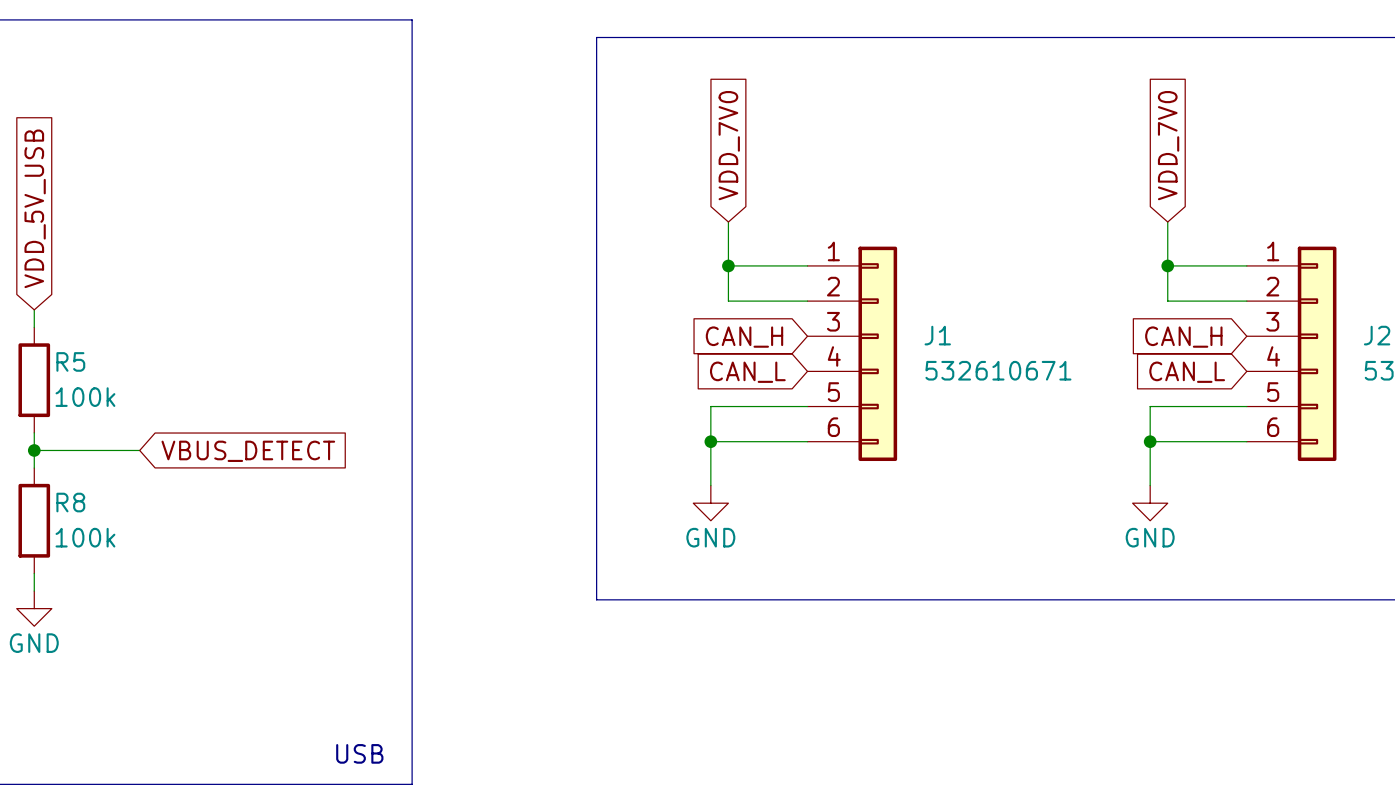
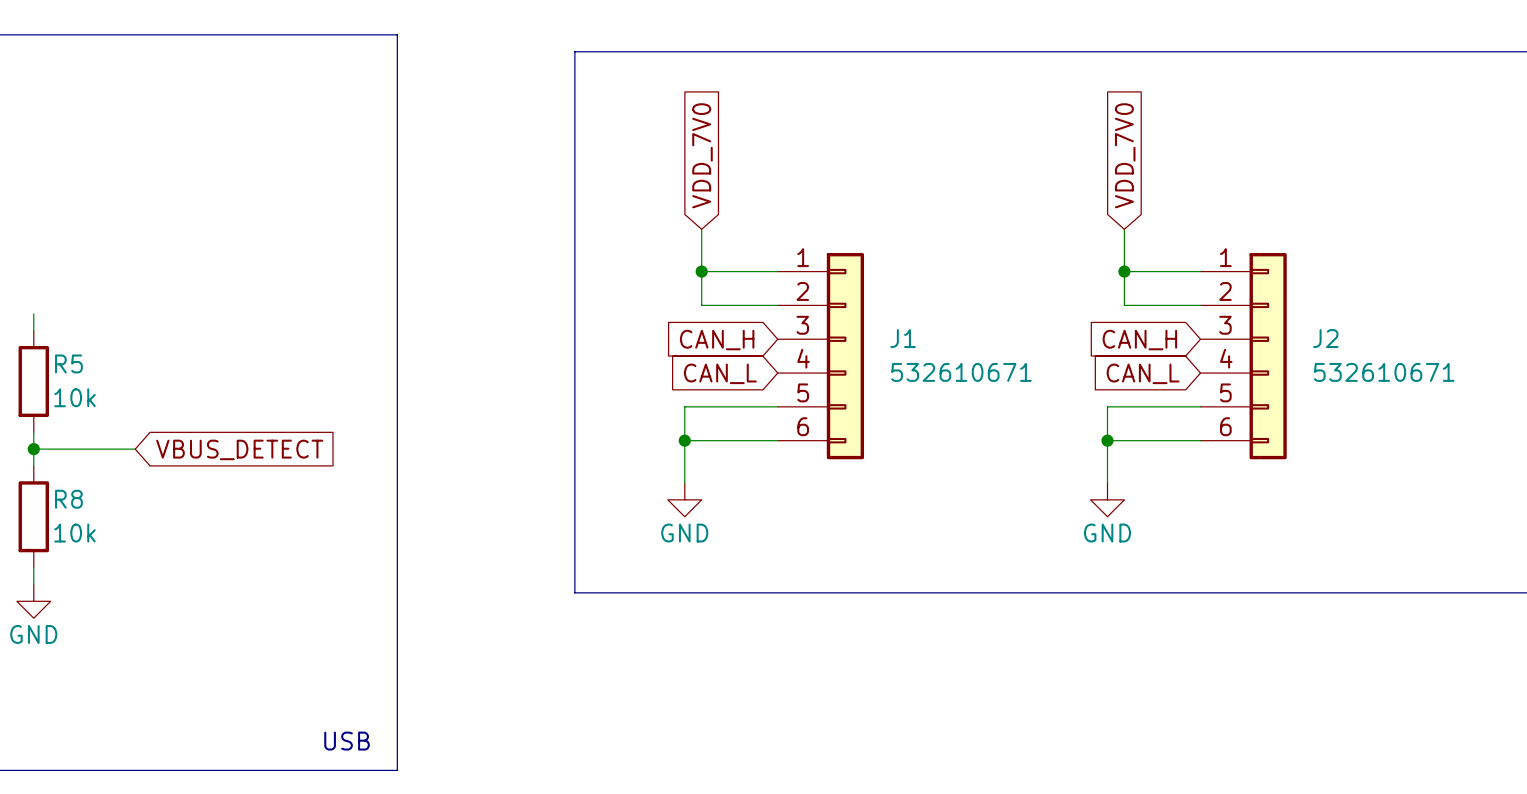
global label: VDD_5V_USB (35, 208) -> none
R5 value: 100k (85, 397) -> 10k (74, 397)
R8 value: 100k (85, 537) -> 10k (74, 533)

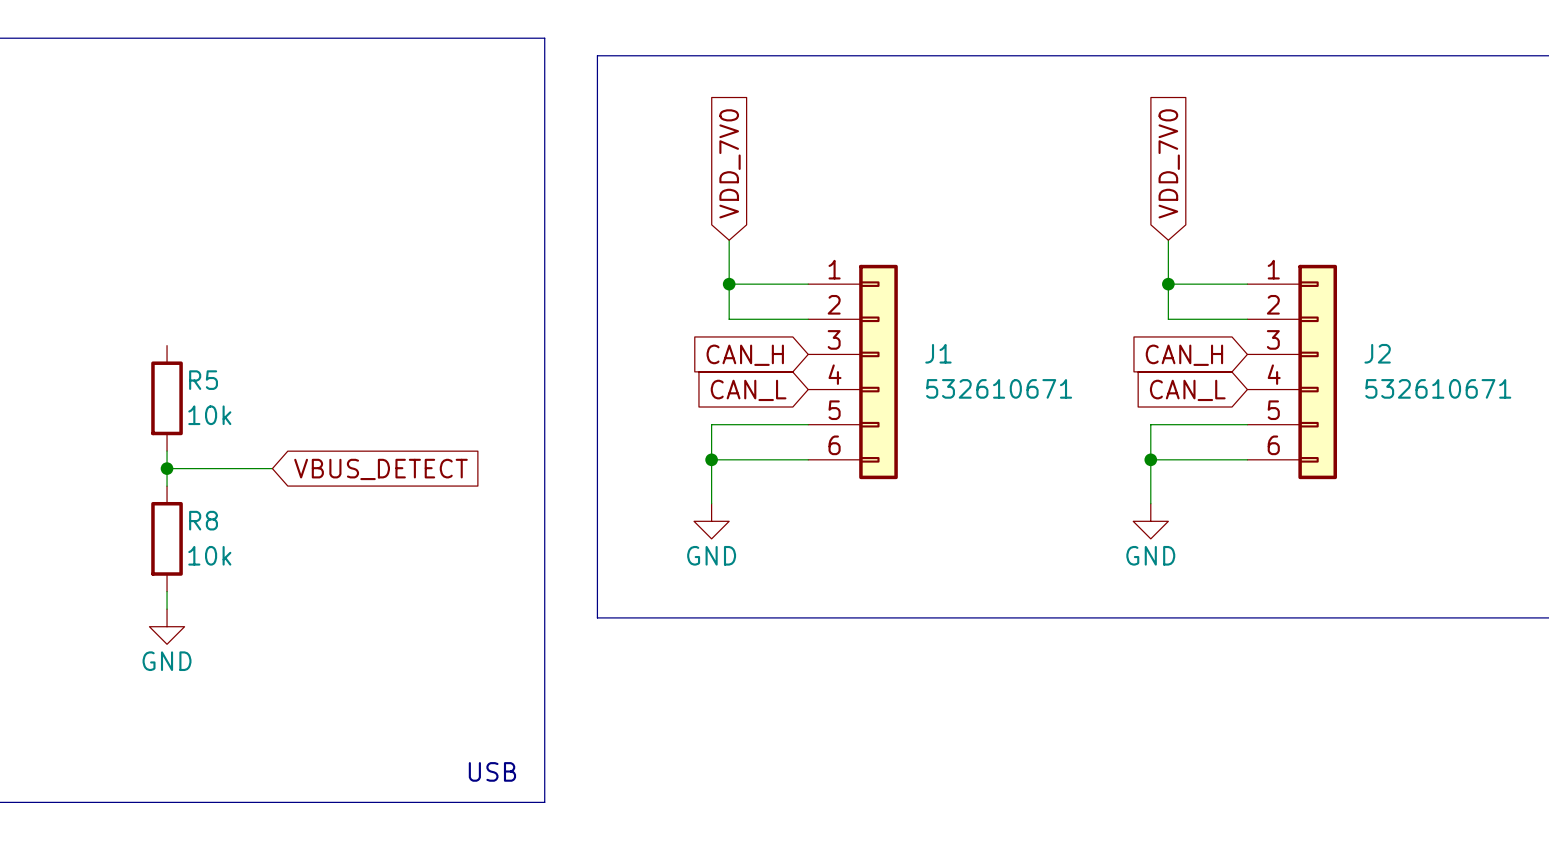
line: (397, 34) (397, 770) -> (412, 38) (544, 38) (544, 802) (412, 802)
wire: (33, 313) (33, 330) -> none
R5 position: (33, 381) -> (167, 398)
wire: (33, 432) (33, 466) -> (167, 451) (167, 486)
wire: (33, 449) (135, 449) -> (167, 468) (272, 468)
junction: (33, 449) -> none
junction: none -> (167, 468)
global label position: VBUS_DETECT (239, 449) -> VBUS_DETECT (380, 469)
R8 position: (33, 516) -> (167, 538)
wire: (33, 567) (33, 584) -> (167, 591) (167, 609)
power symbol position: GND (33, 601) -> GND (167, 626)
text position: USB (347, 741) -> USB (492, 771)

